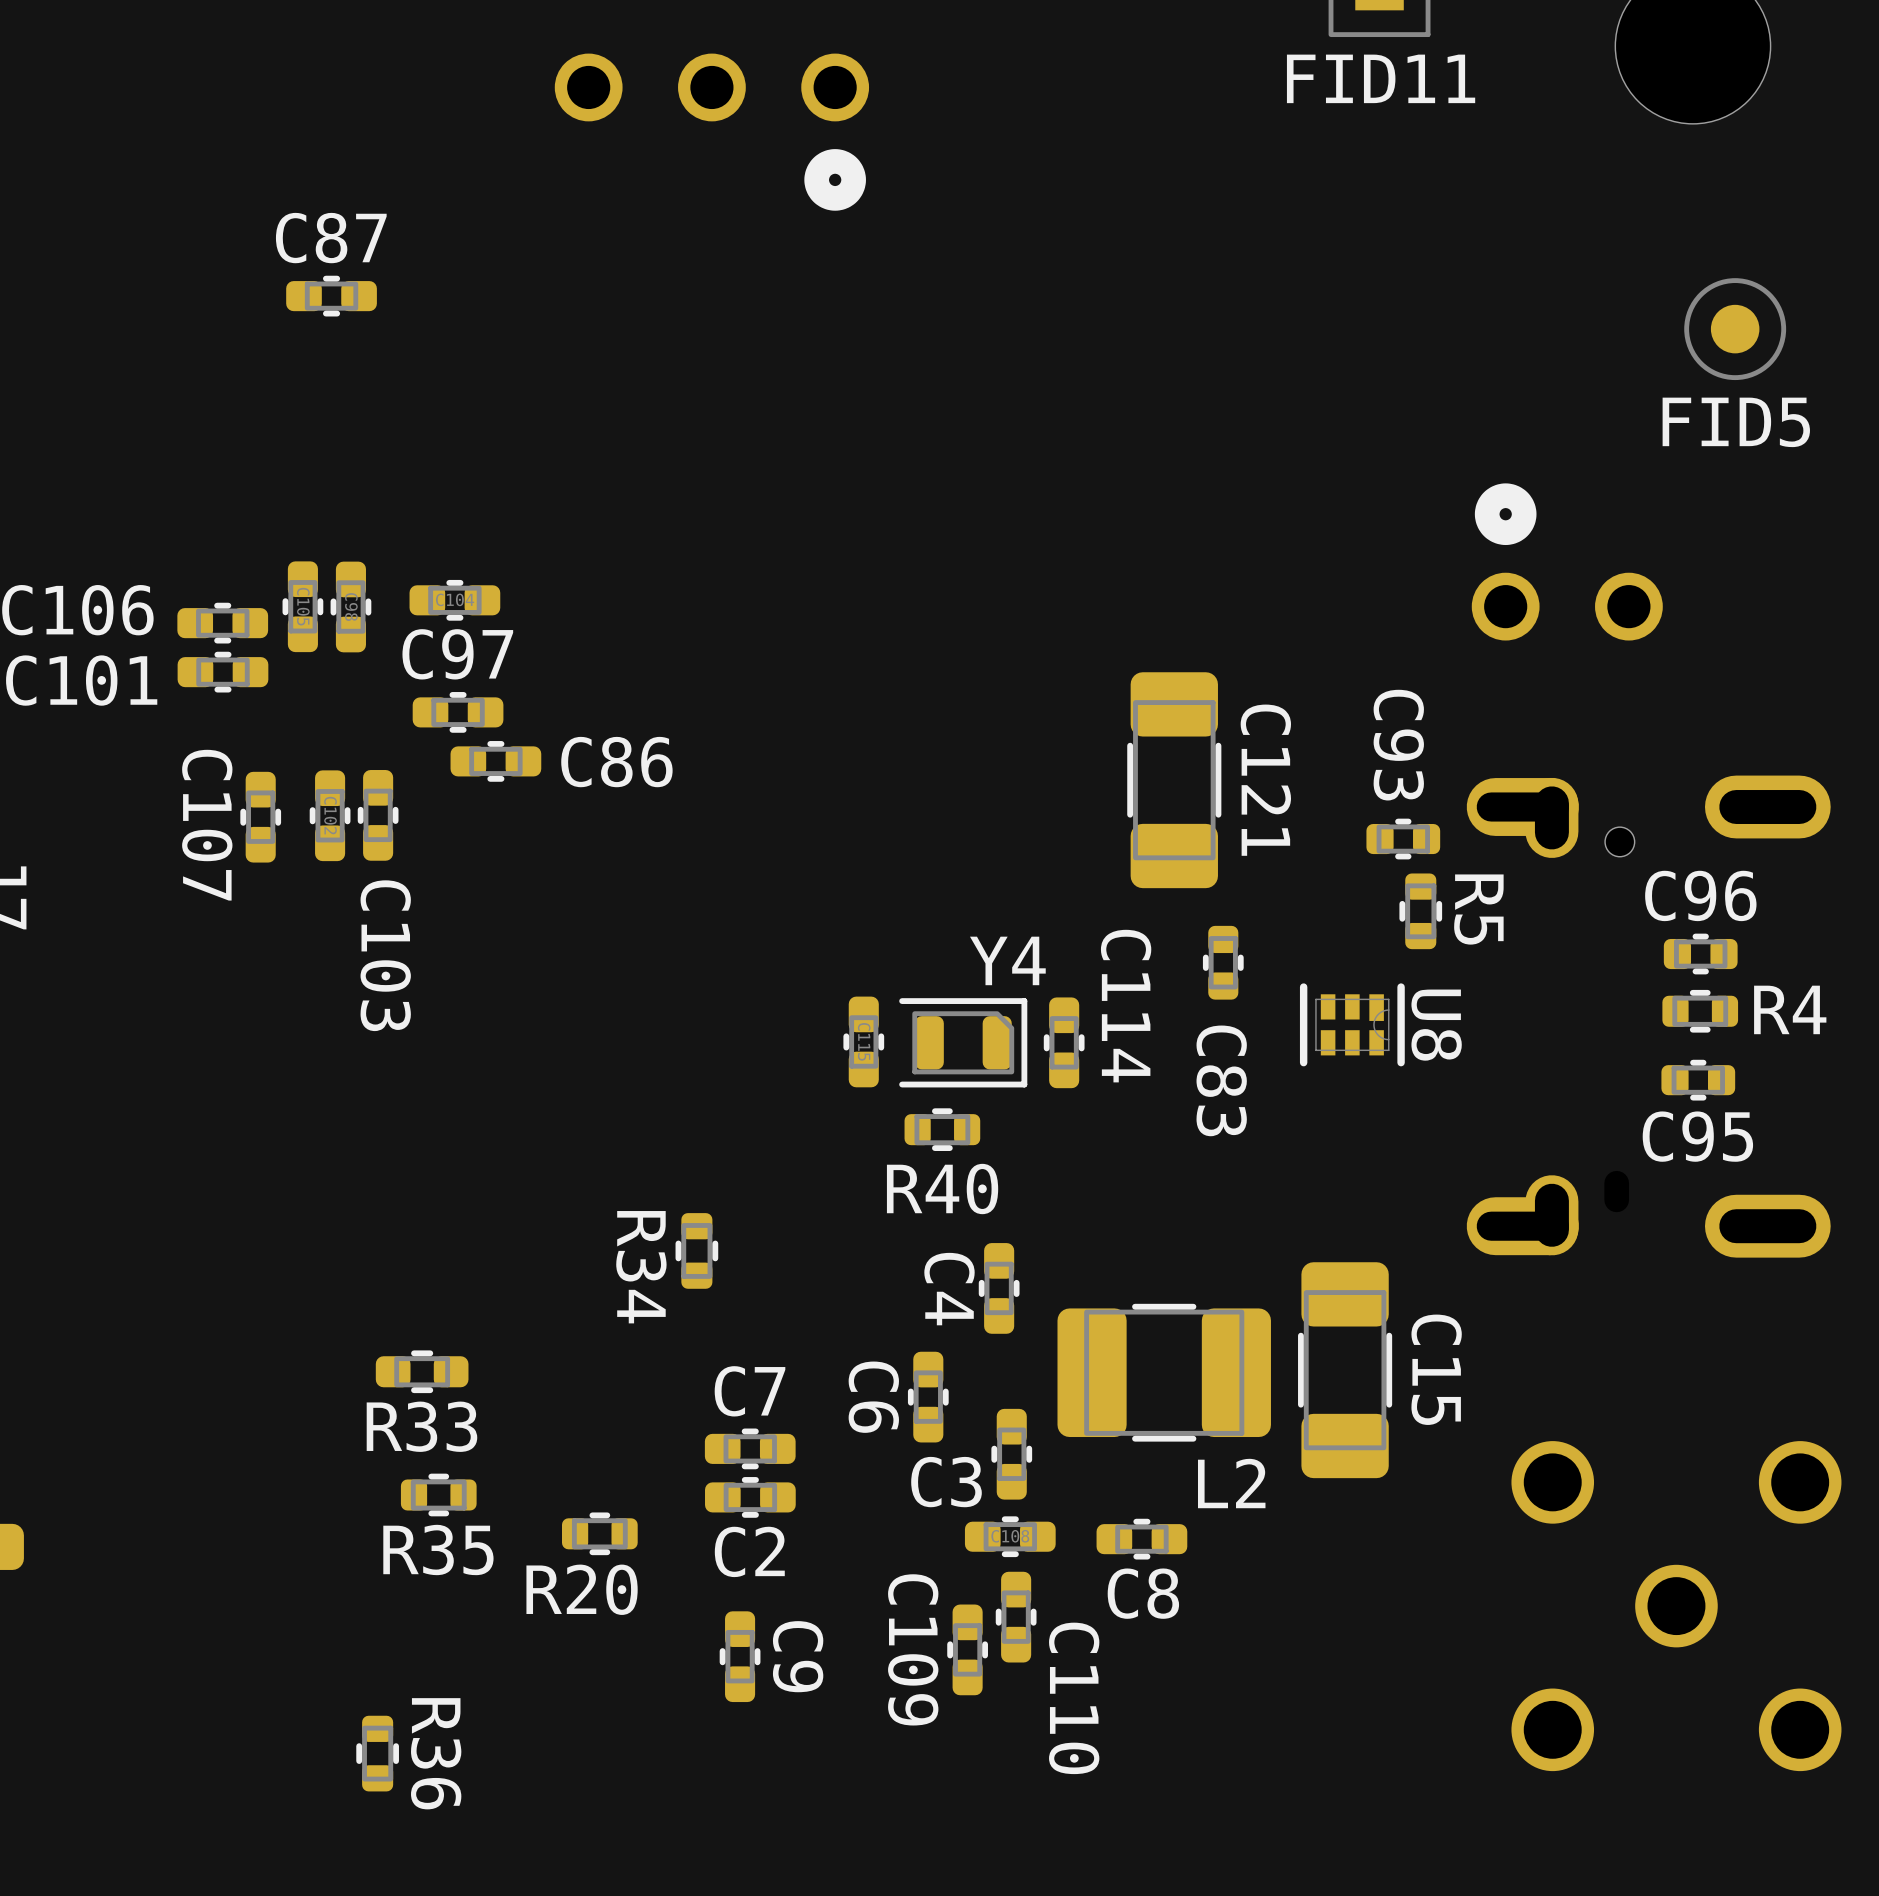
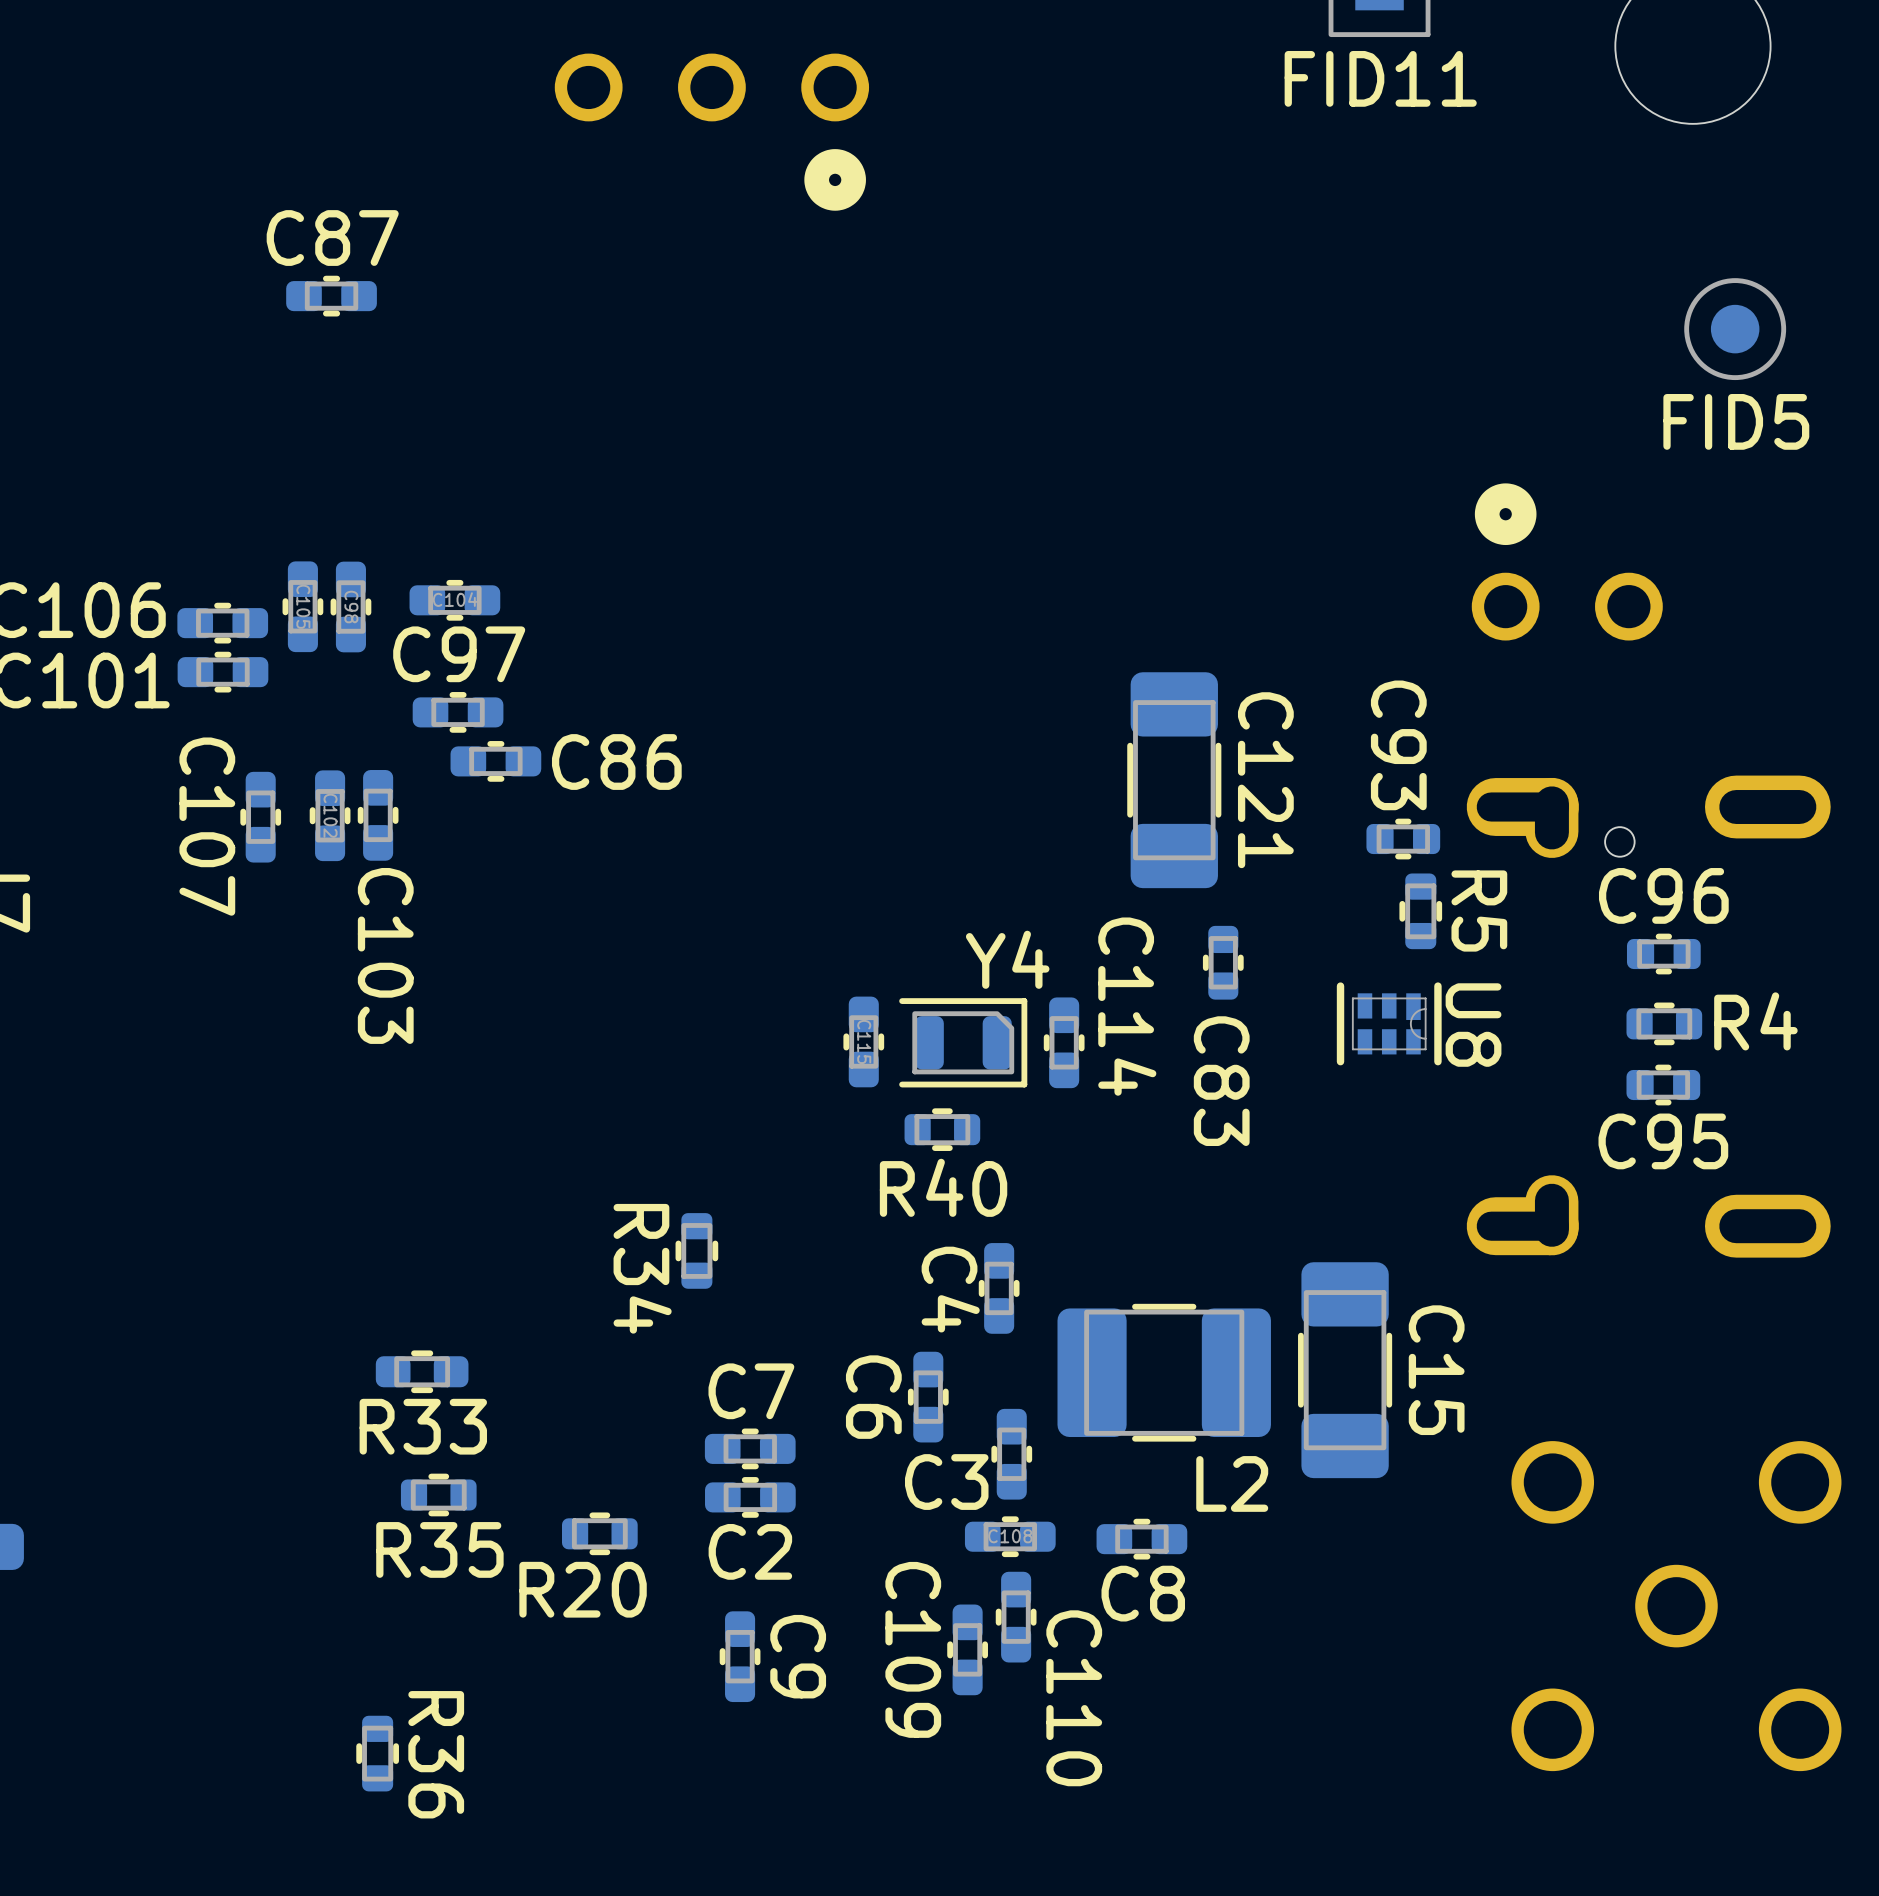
C96 position: (1700, 954) -> (1663, 954)
R4 position: (1700, 1011) -> (1664, 1023)
U8 position: (1352, 1024) -> (1389, 1023)
C95 position: (1698, 1080) -> (1663, 1085)

